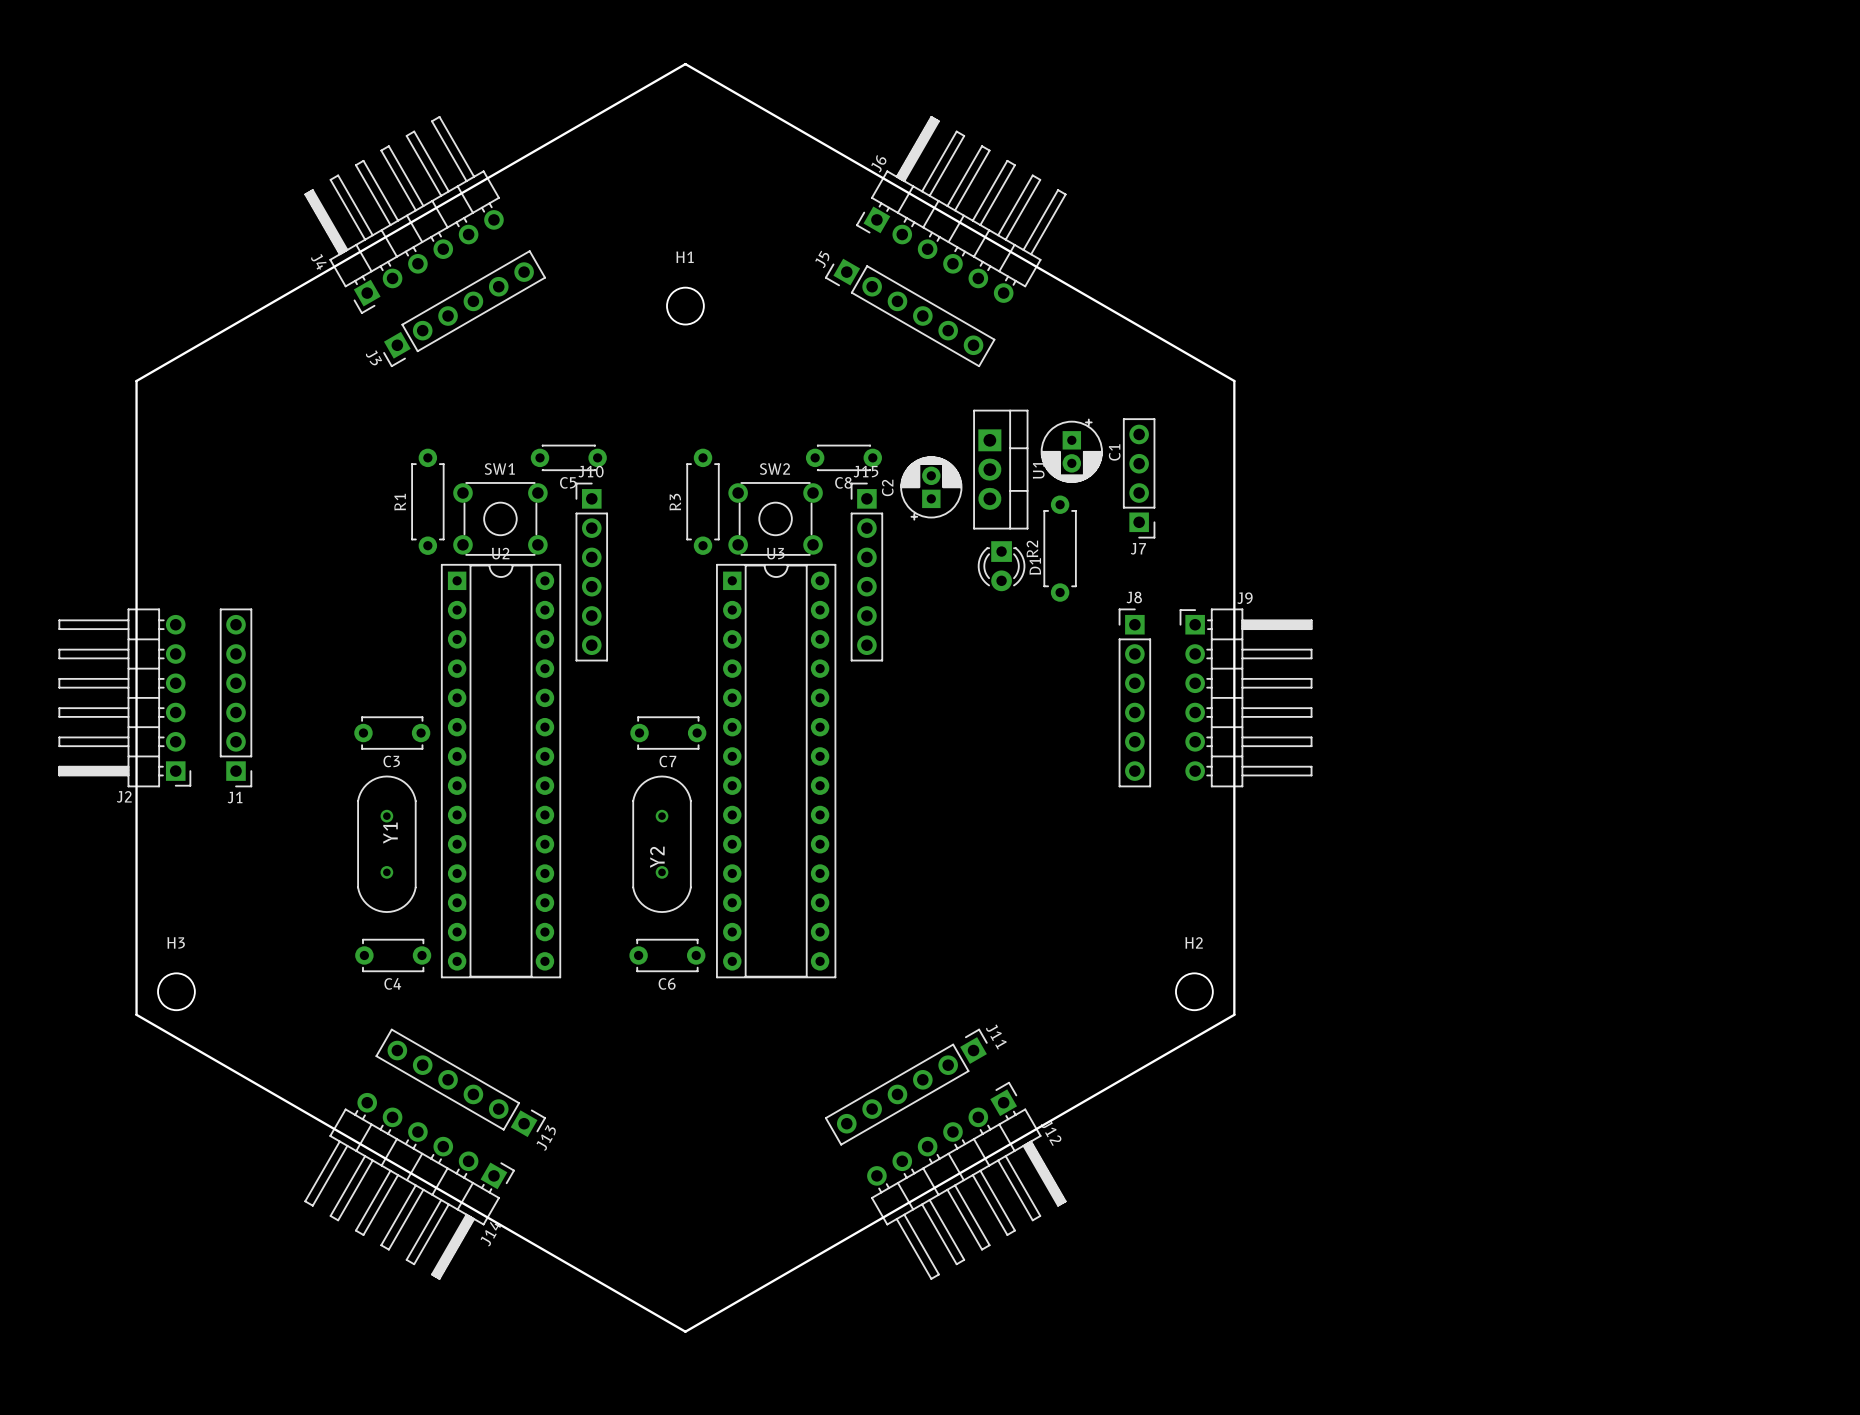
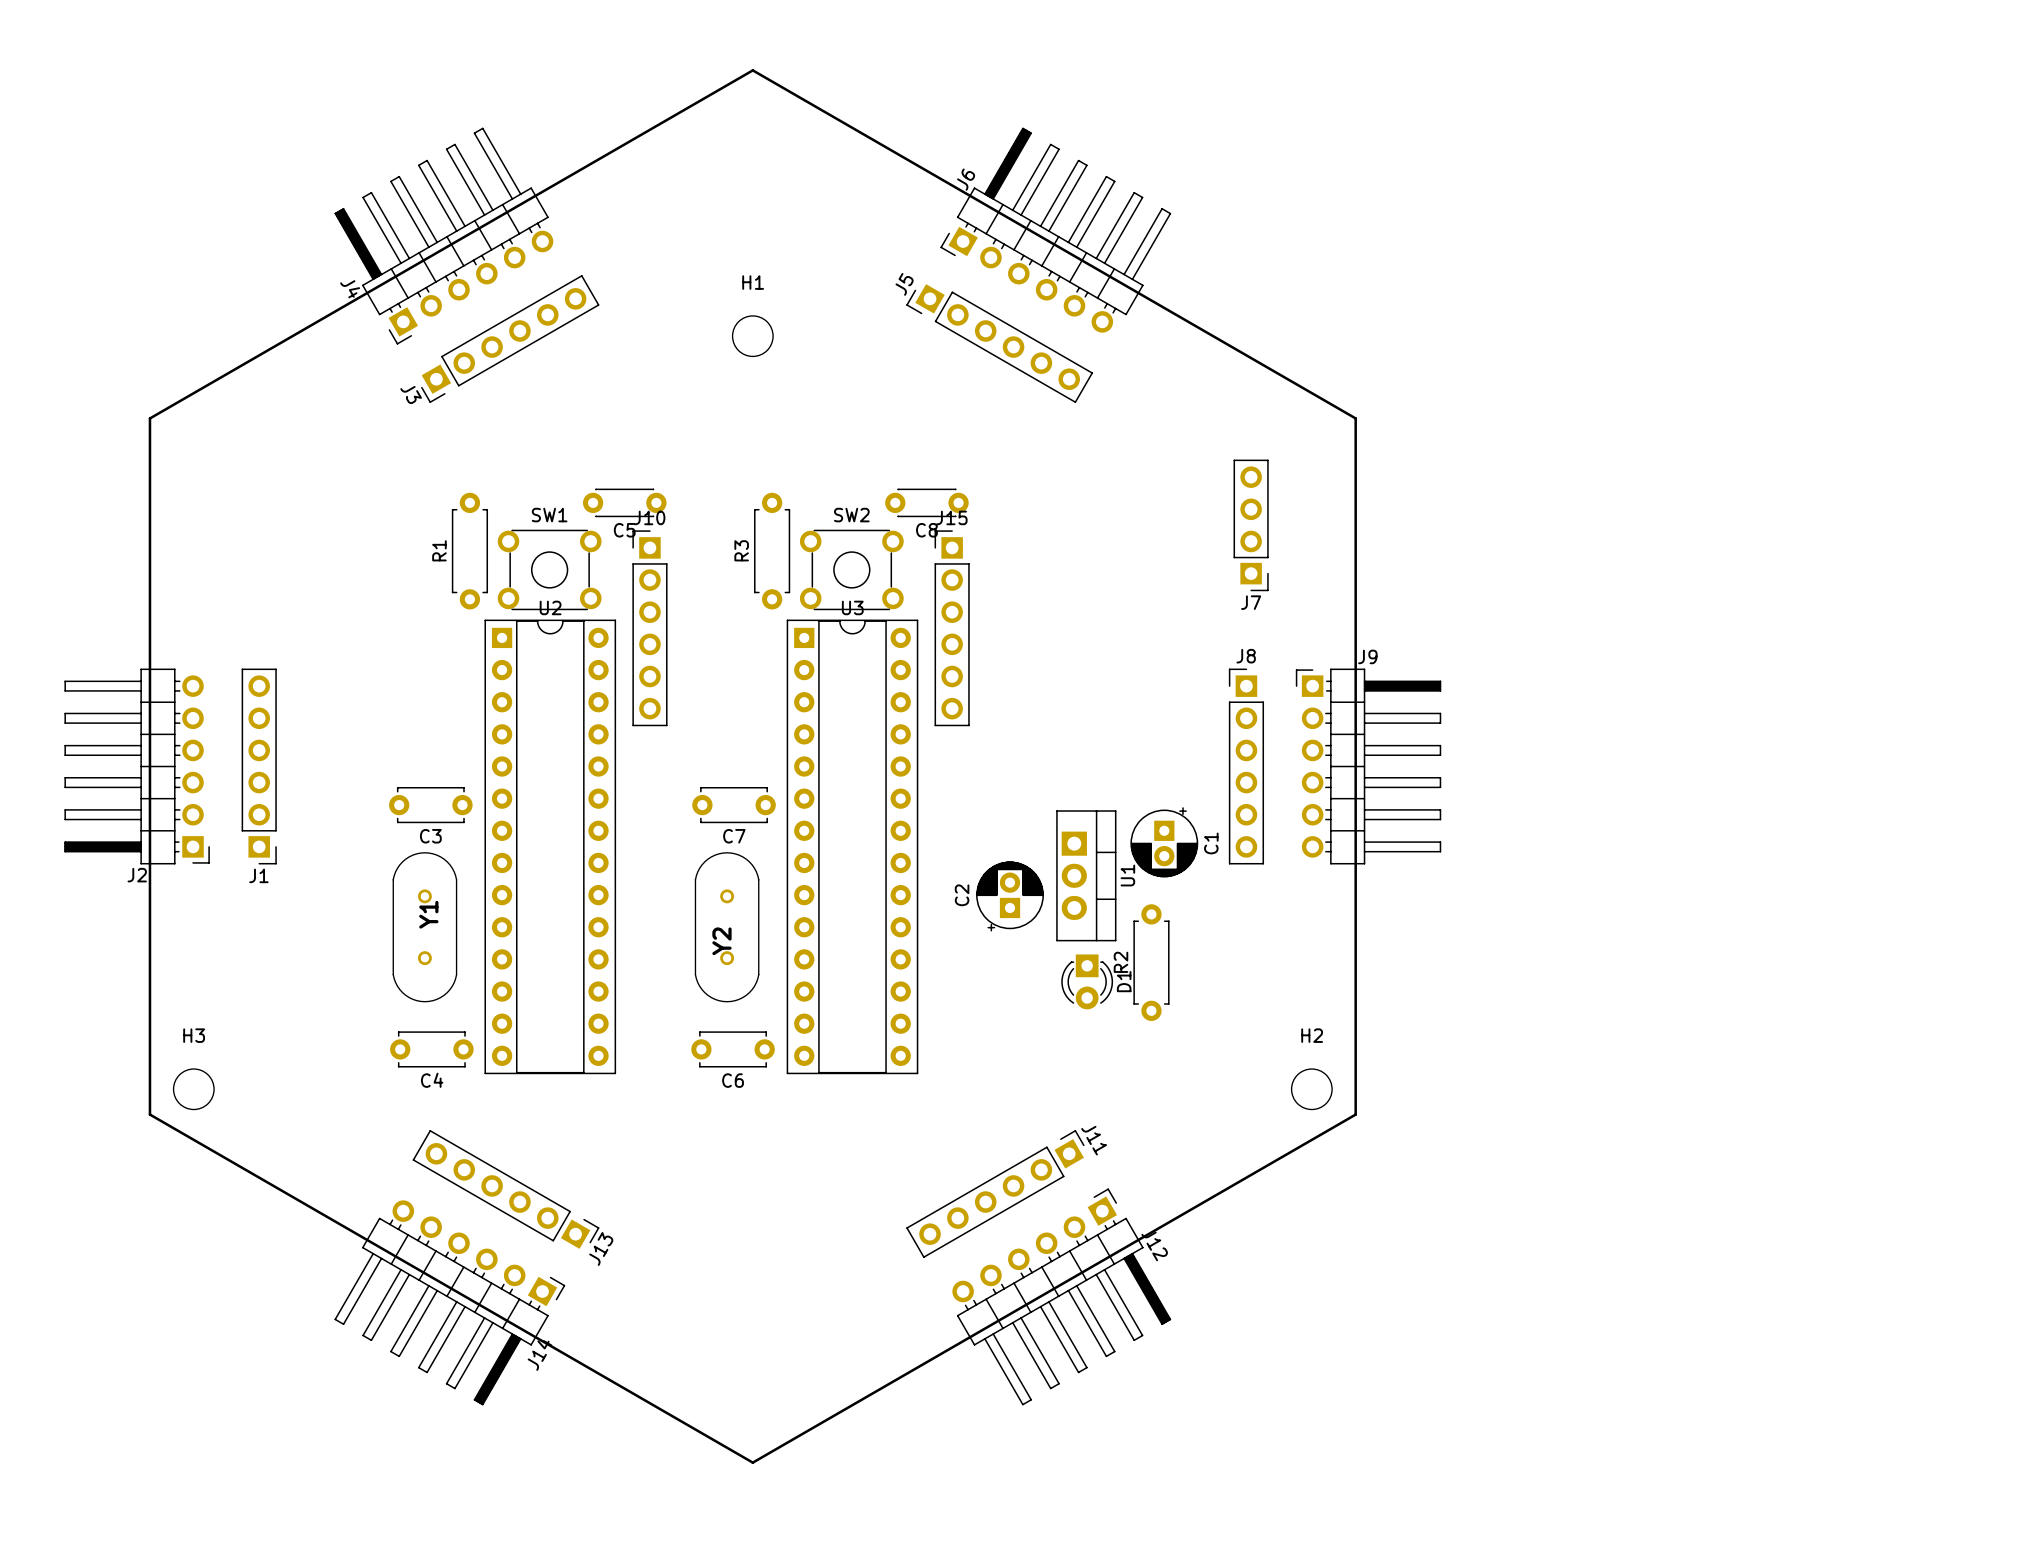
C1 position: (1071, 450) -> (1164, 842)
U1 position: (1000, 469) -> (1086, 875)
C2 position: (931, 488) -> (1010, 896)
R2 position: (1060, 548) -> (1151, 962)
D1 position: (1001, 566) -> (1087, 981)

